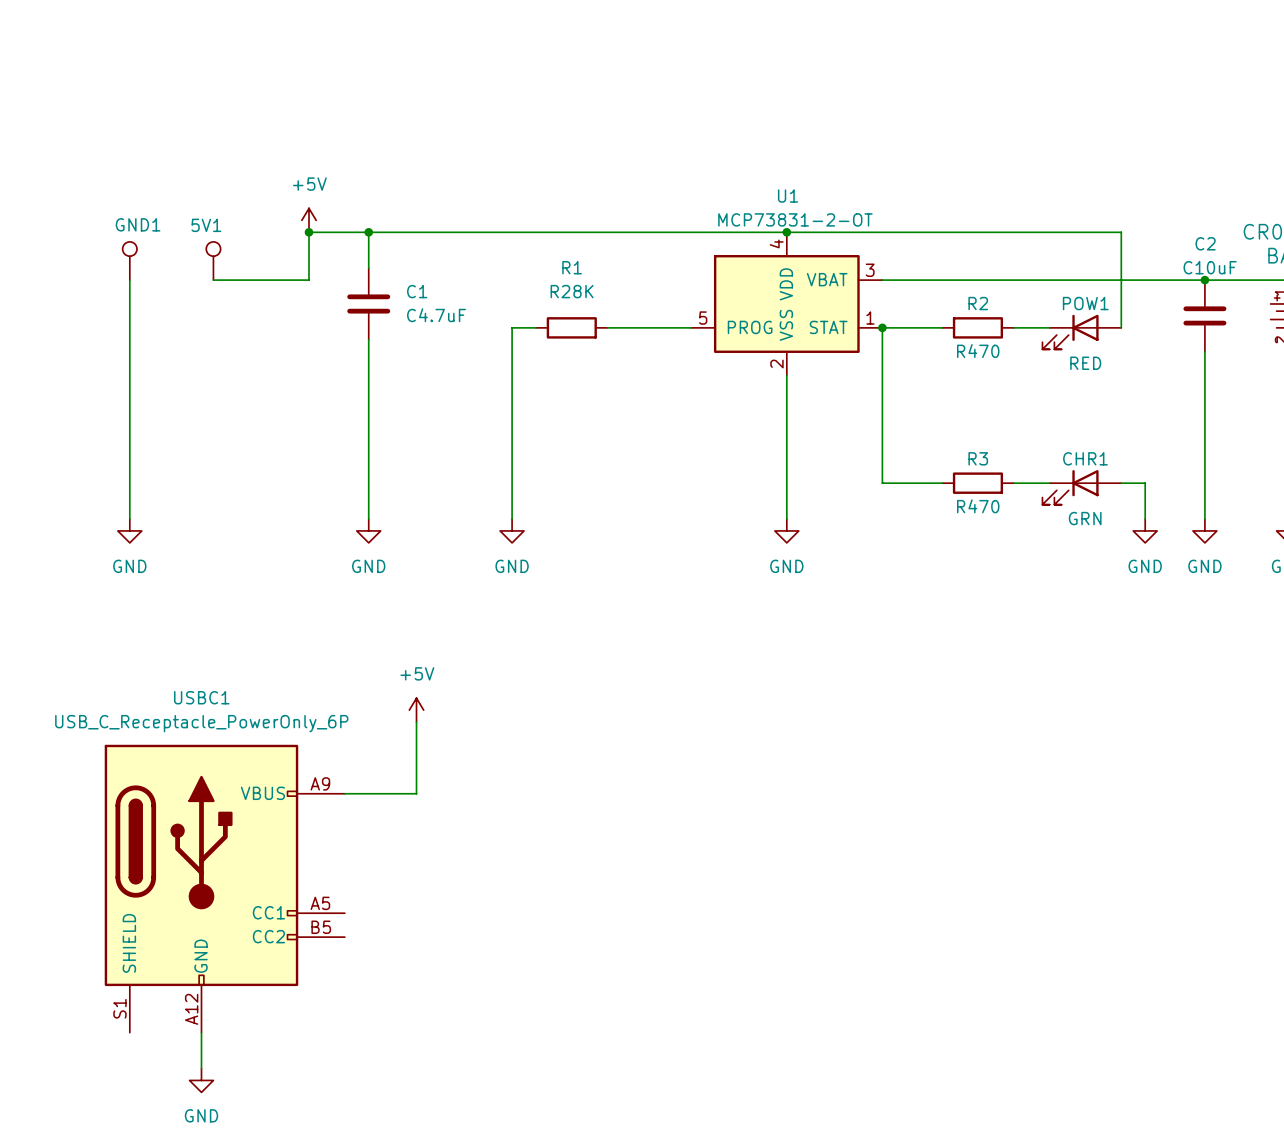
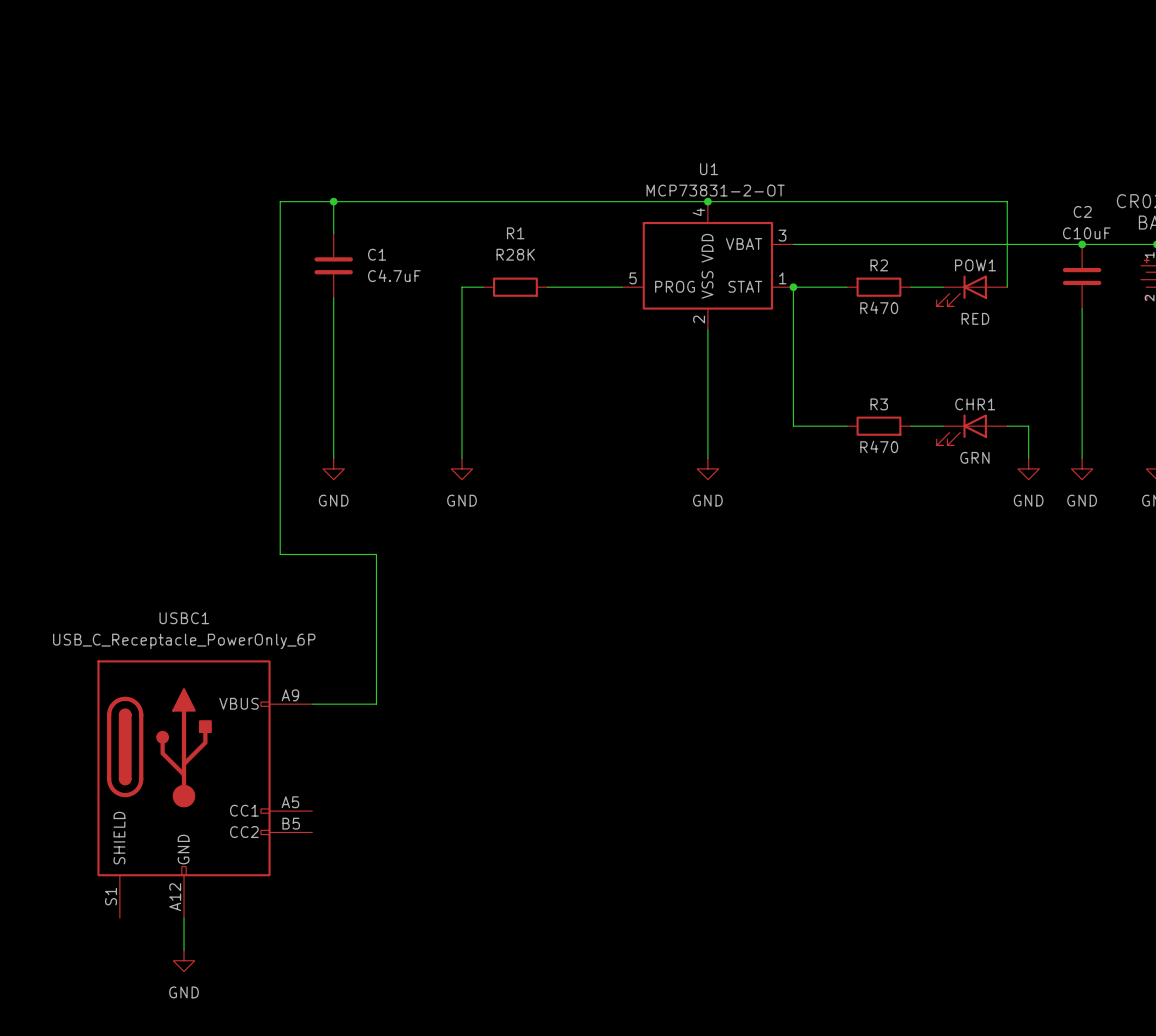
power symbol: +5V (309, 220) -> none
junction: (309, 232) -> none
GND1: (129, 260) -> none
5V1: (213, 260) -> none
wire: (129, 280) (129, 519) -> none
wire: (213, 280) (309, 280) -> (376, 640) (376, 554) (280, 554) (280, 244)
power symbol: GND (129, 530) -> none
power symbol: +5V (416, 710) -> none

